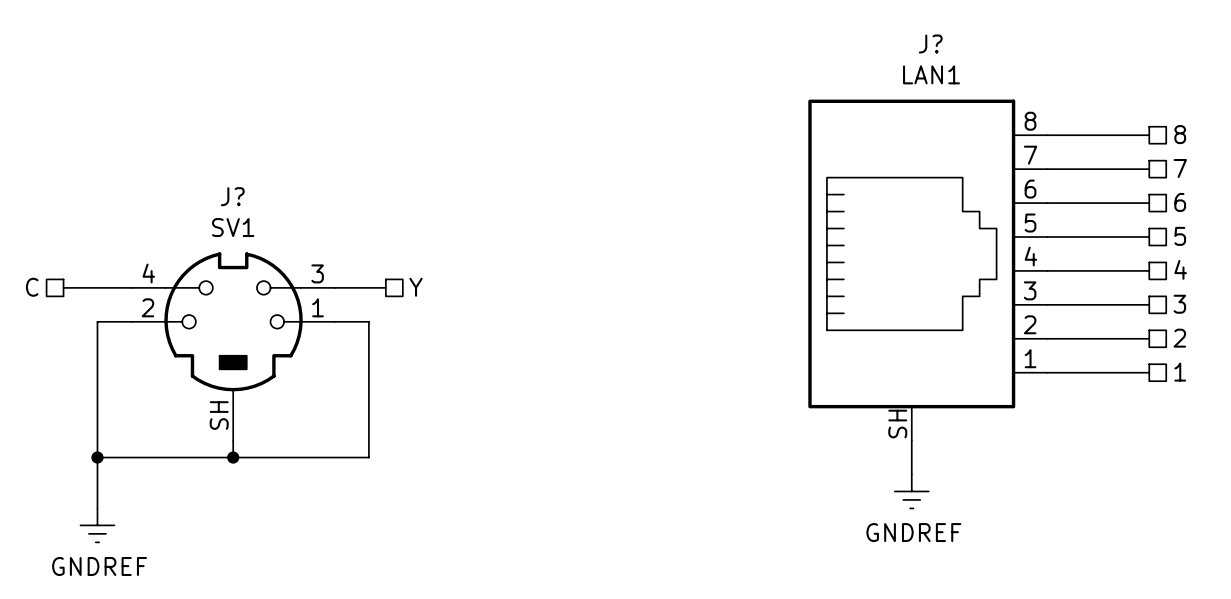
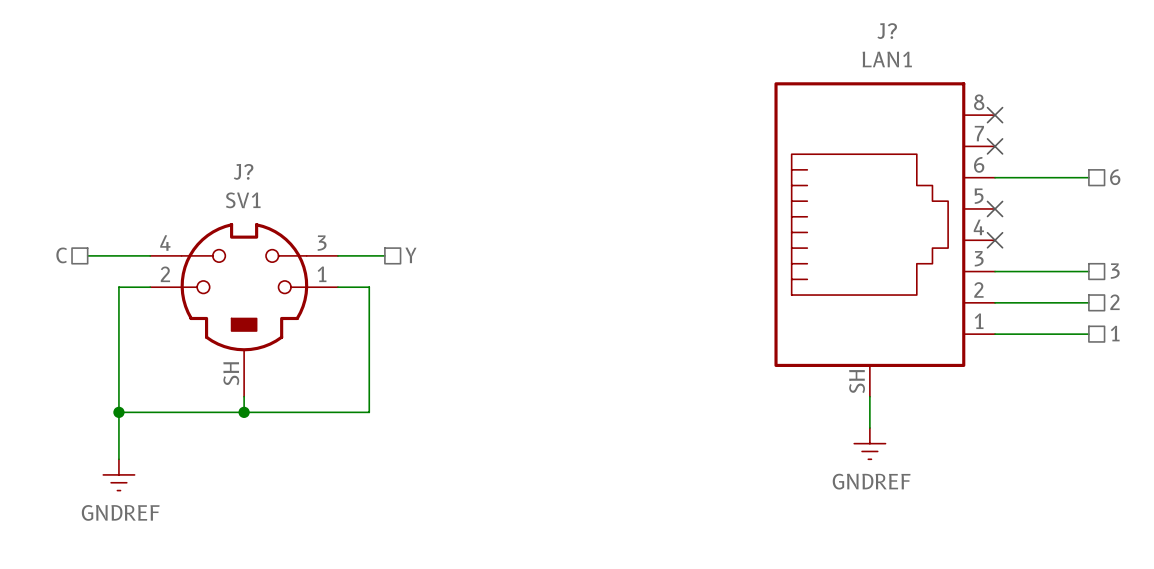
hierarchical label: 8 (1180, 134) -> none
wire: (1047, 135) (1149, 135) -> none
no-connect mark: none -> (995, 115)
hierarchical label: 7 (1180, 168) -> none
wire: (1047, 169) (1149, 169) -> none
no-connect mark: none -> (995, 146)
hierarchical label: 5 (1180, 236) -> none
wire: (1047, 237) (1149, 237) -> none
no-connect mark: none -> (995, 208)
hierarchical label: 4 (1180, 269) -> none
wire: (1047, 270) (1149, 270) -> none
no-connect mark: none -> (995, 240)

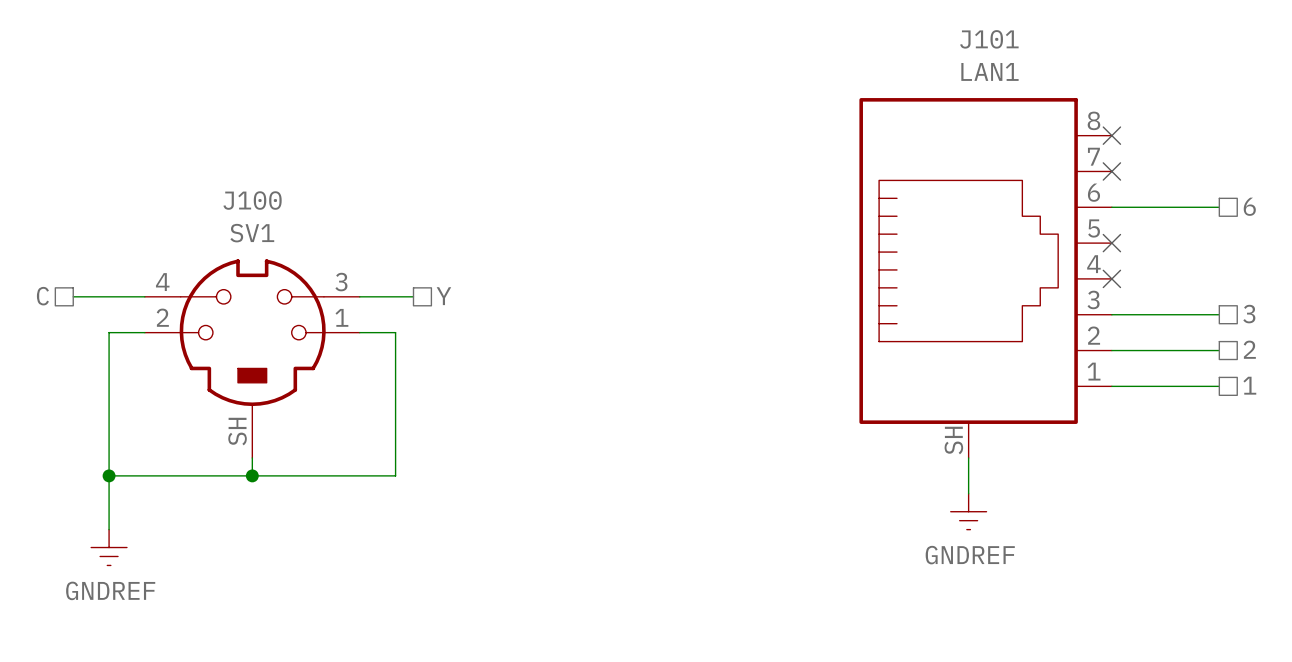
J? name: J? (887, 31) -> J101 (989, 39)
J? name: J? (243, 171) -> J100 (252, 200)

